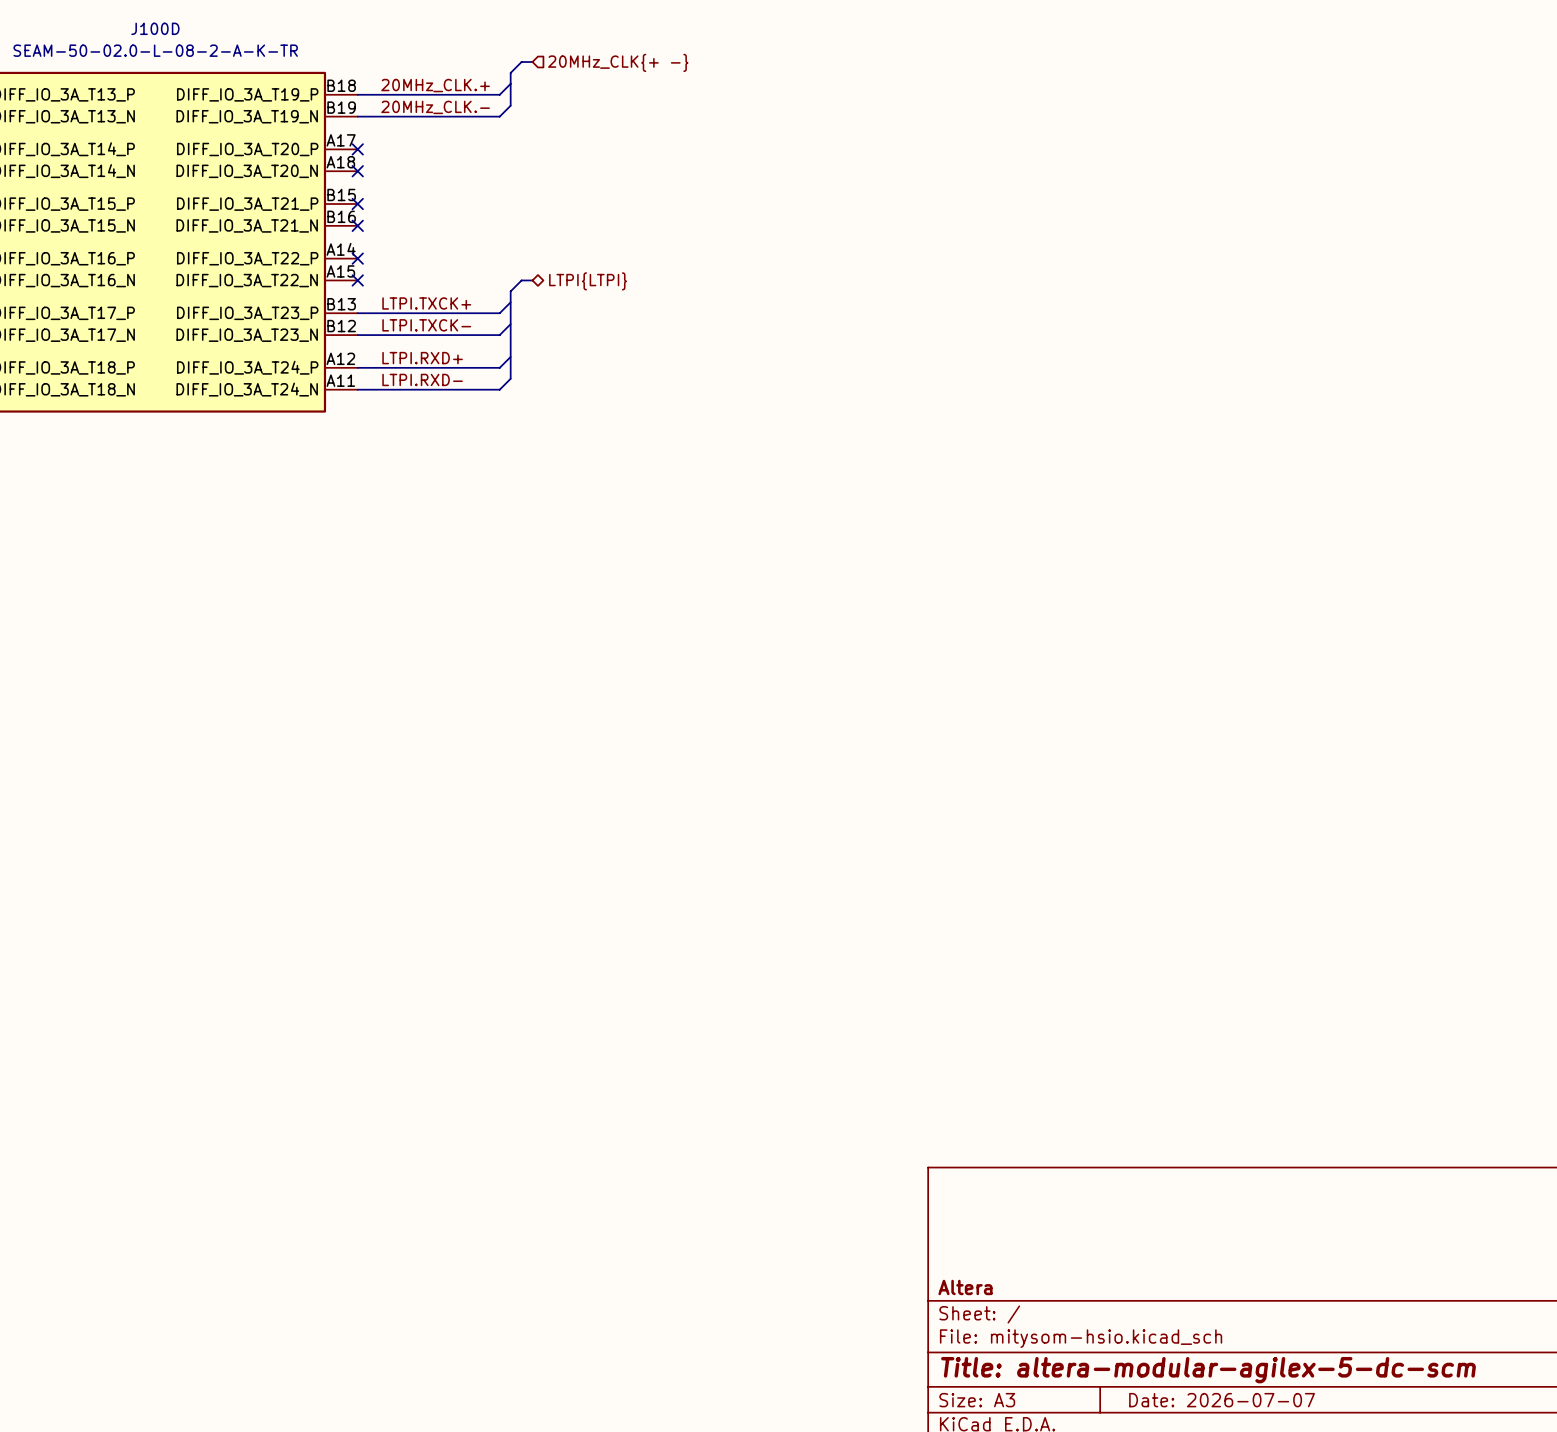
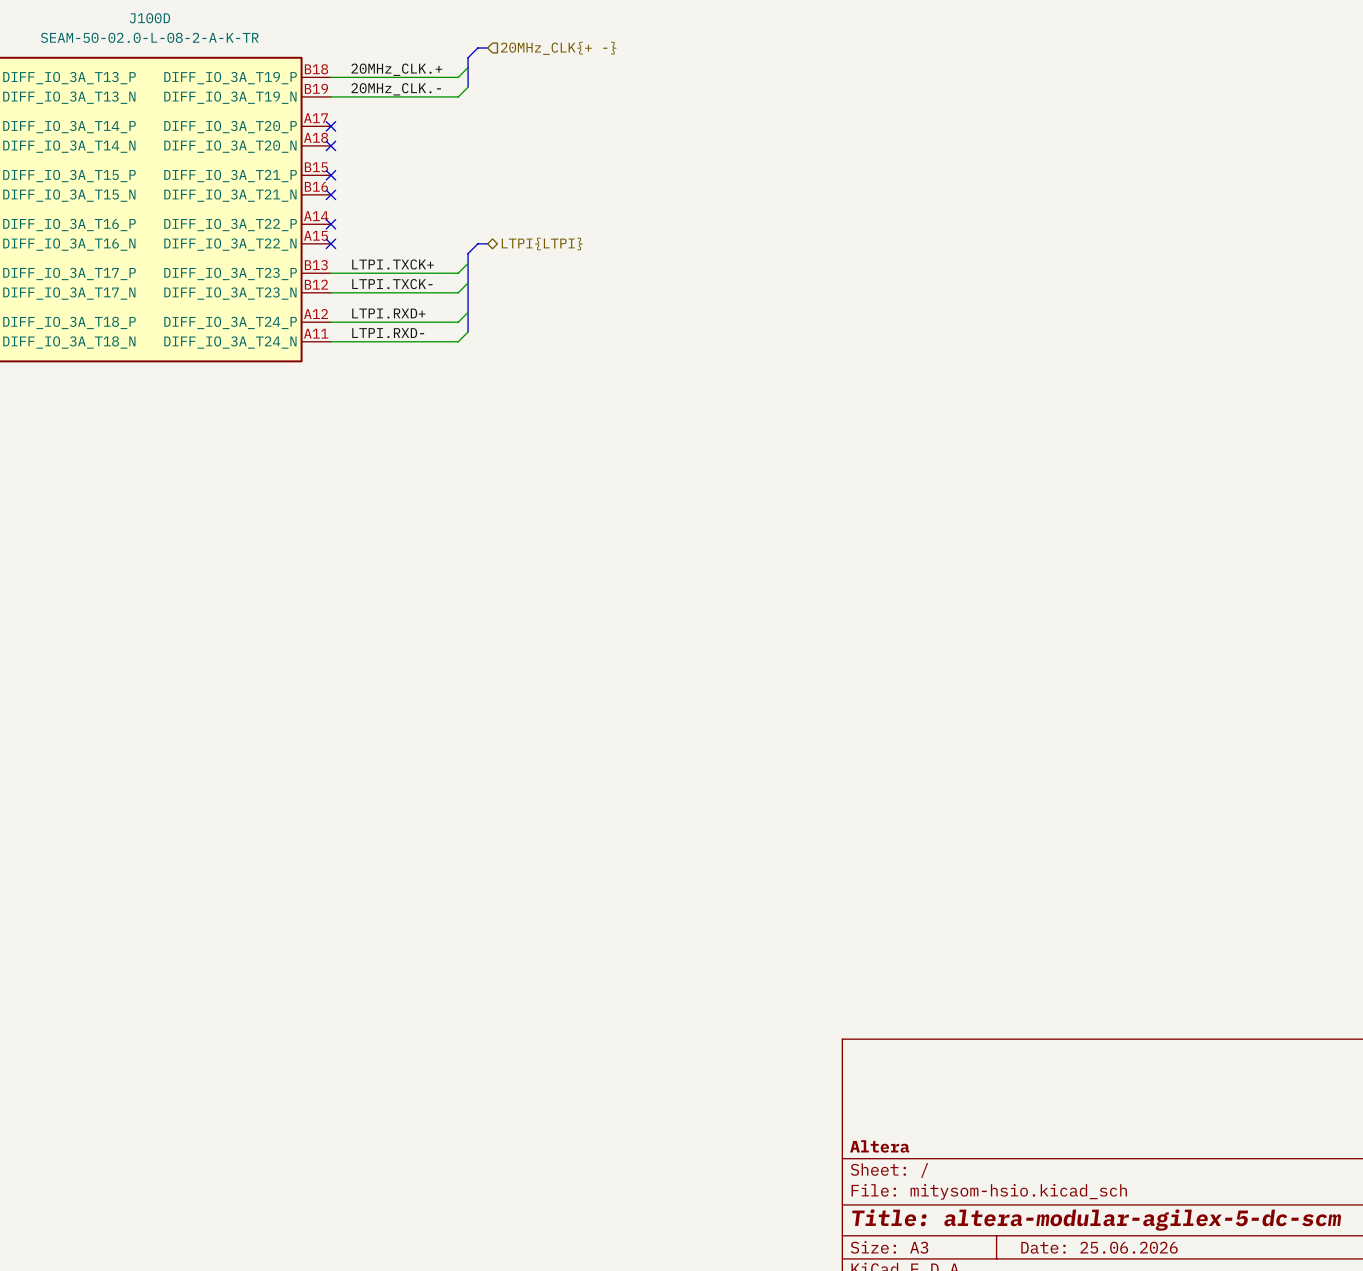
title block: Date: 2026-07-07 (1222, 1400) -> Date: 25.06.2026 (1099, 1247)

